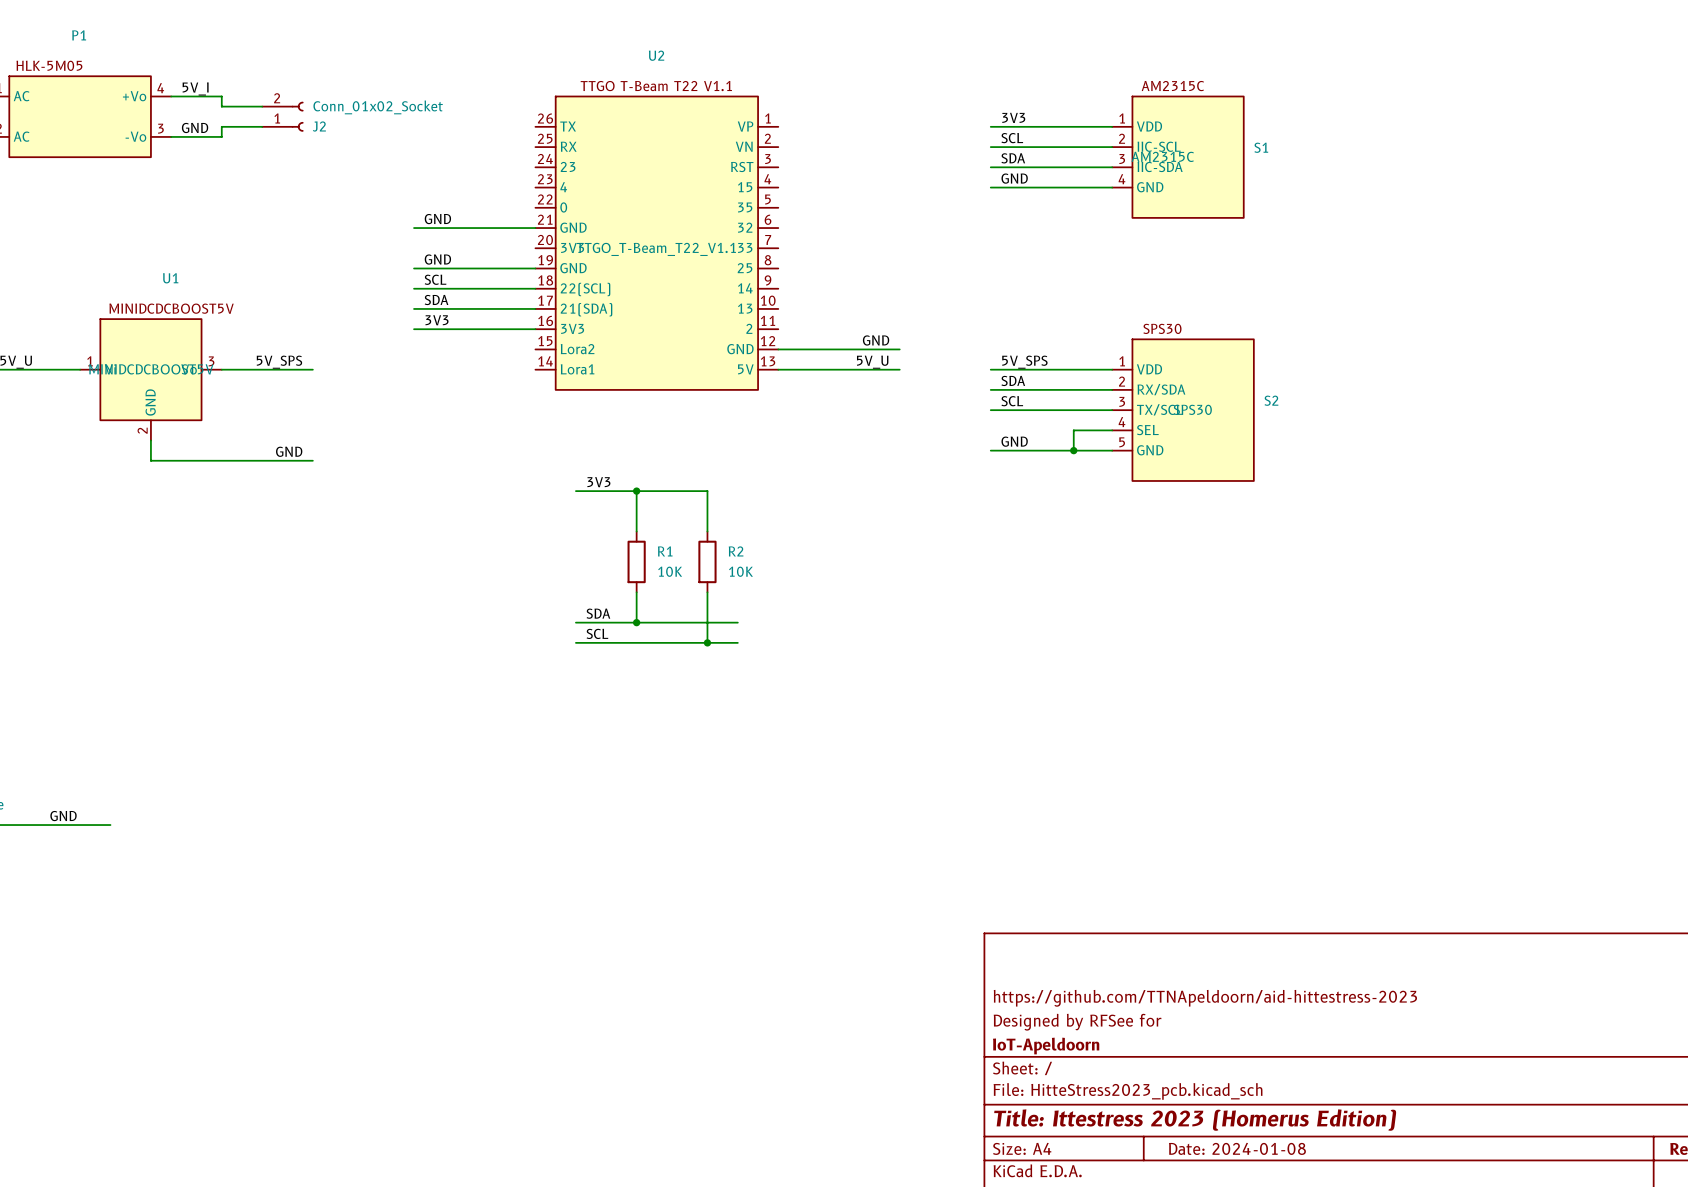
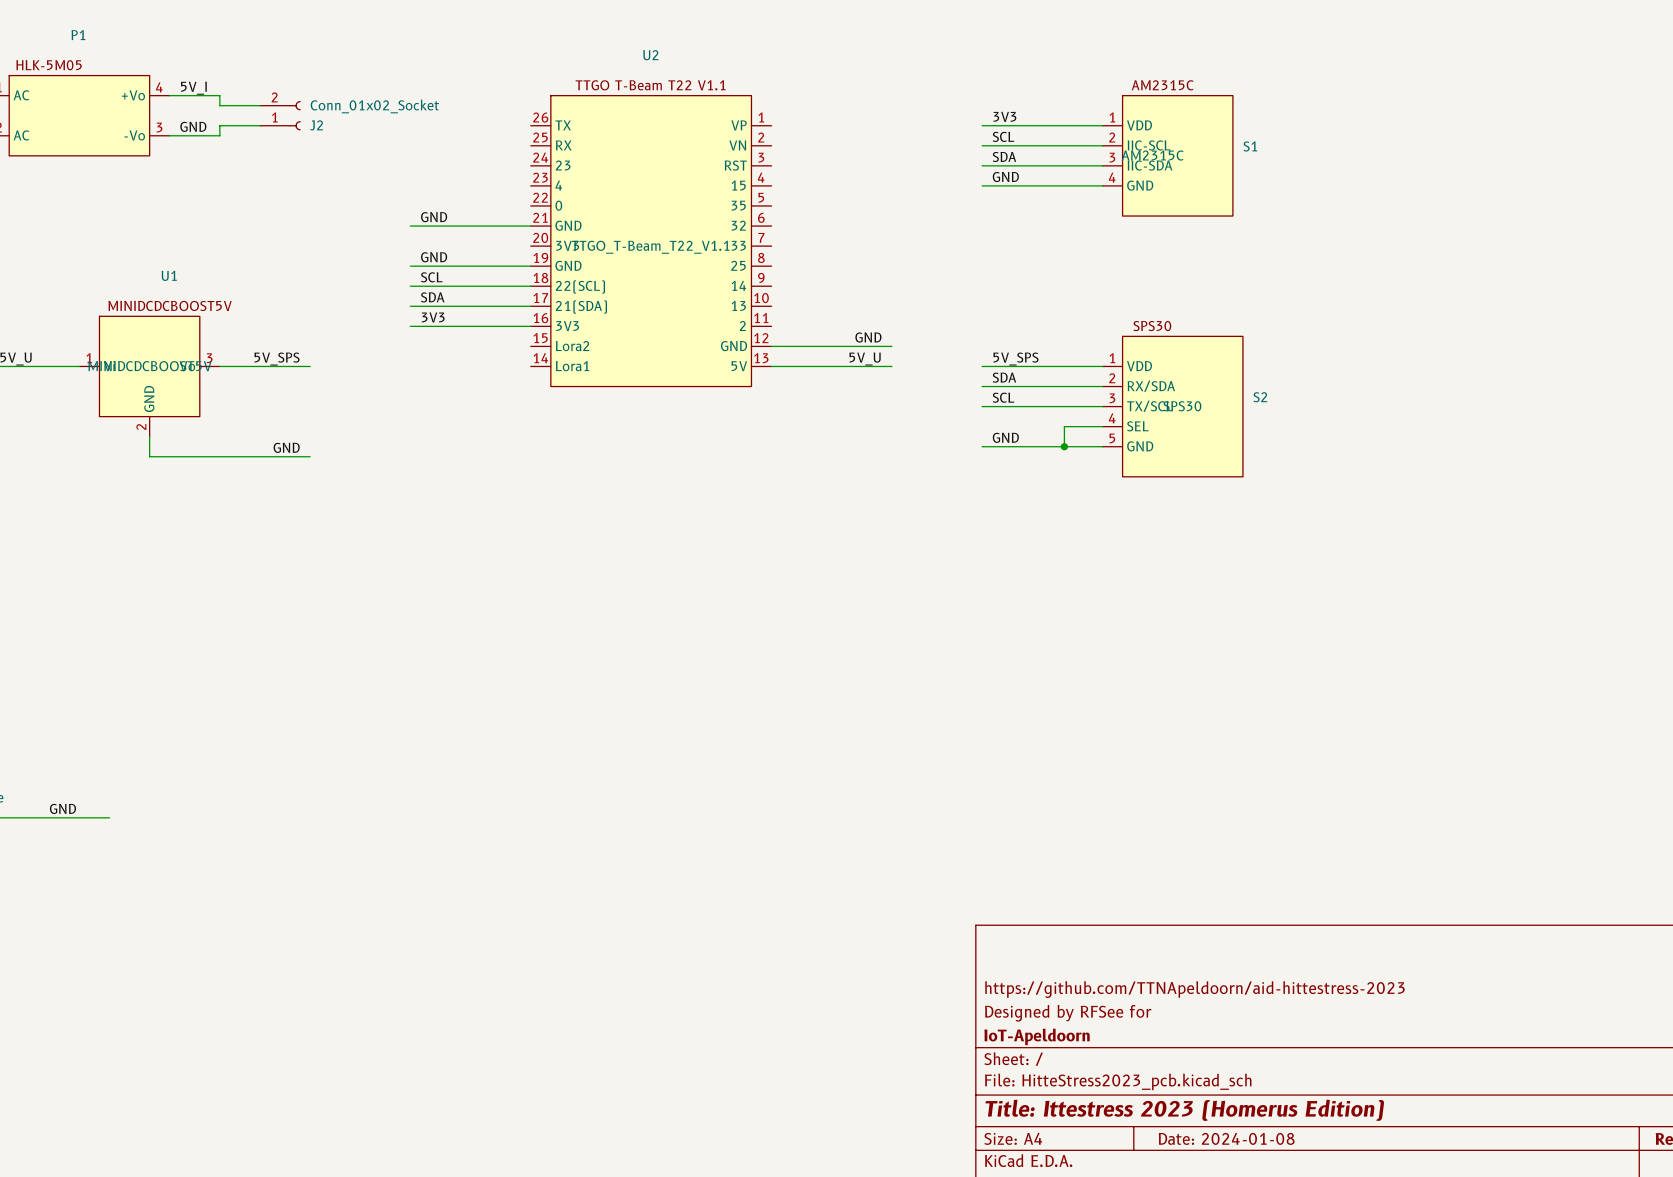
label: 3V3 (598, 482) -> none
wire: (575, 491) (707, 491) (707, 531) -> none
wire: (636, 491) (636, 531) -> none
junction: (636, 491) -> none
R1: 10K (636, 561) -> none
R2: 10K (707, 561) -> none
wire: (636, 592) (636, 622) -> none
wire: (707, 592) (707, 642) -> none
label: SDA (598, 613) -> none
wire: (575, 622) (737, 622) -> none
junction: (636, 622) -> none
label: SCL (597, 633) -> none
wire: (575, 642) (737, 642) -> none
junction: (707, 642) -> none

